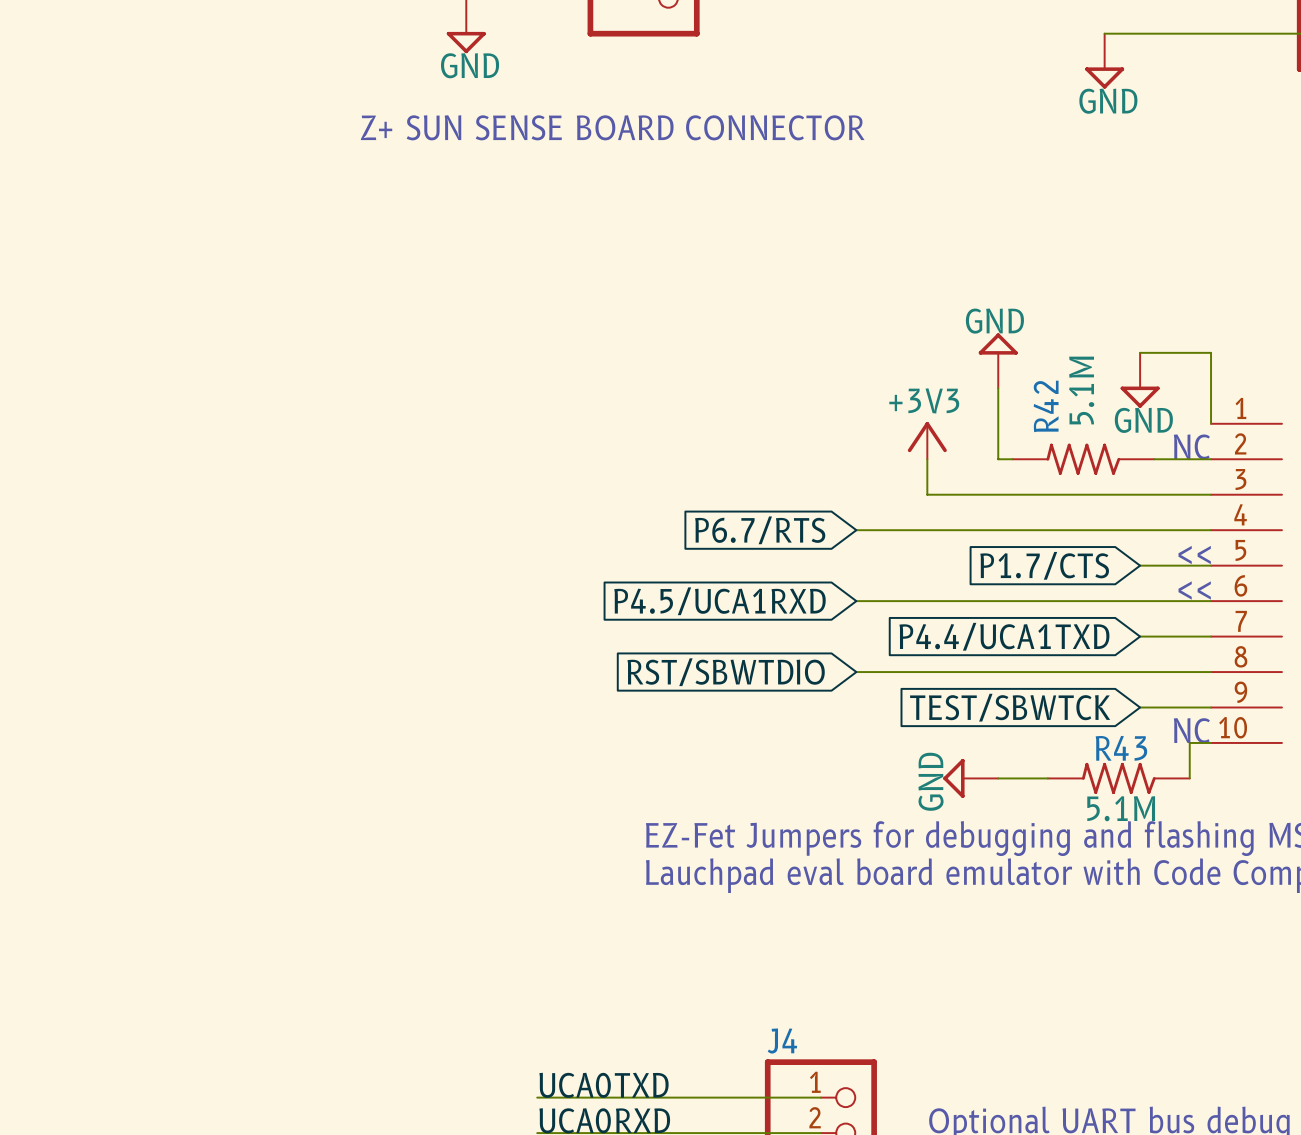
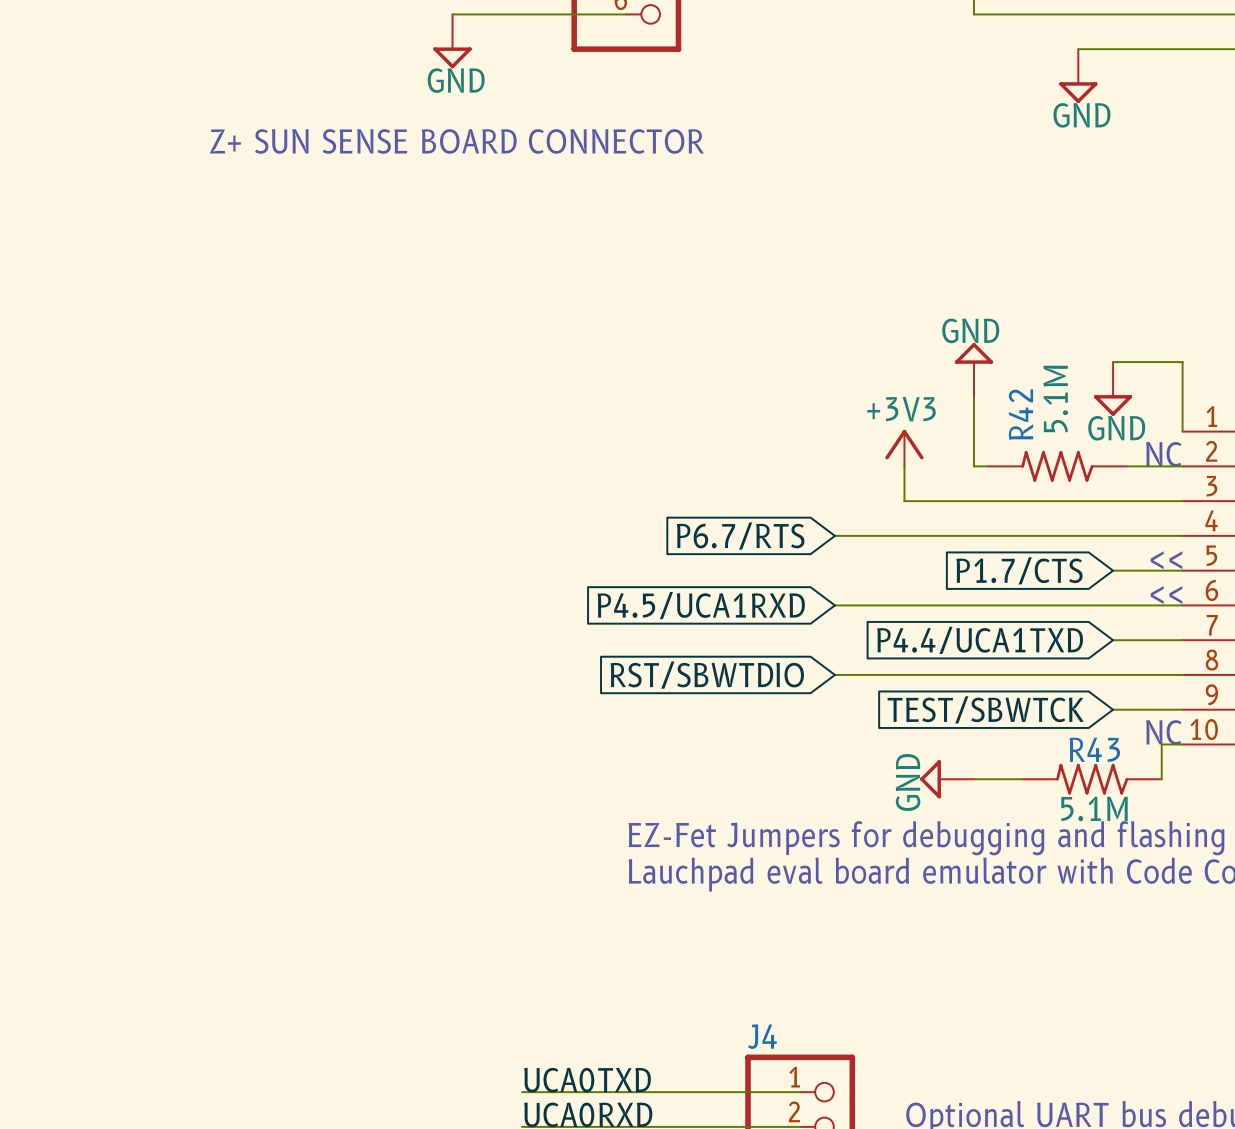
text position: Z+ SUN SENSE BOARD CONNECTOR (612, 127) -> Z+ SUN SENSE BOARD CONNECTOR (456, 141)

